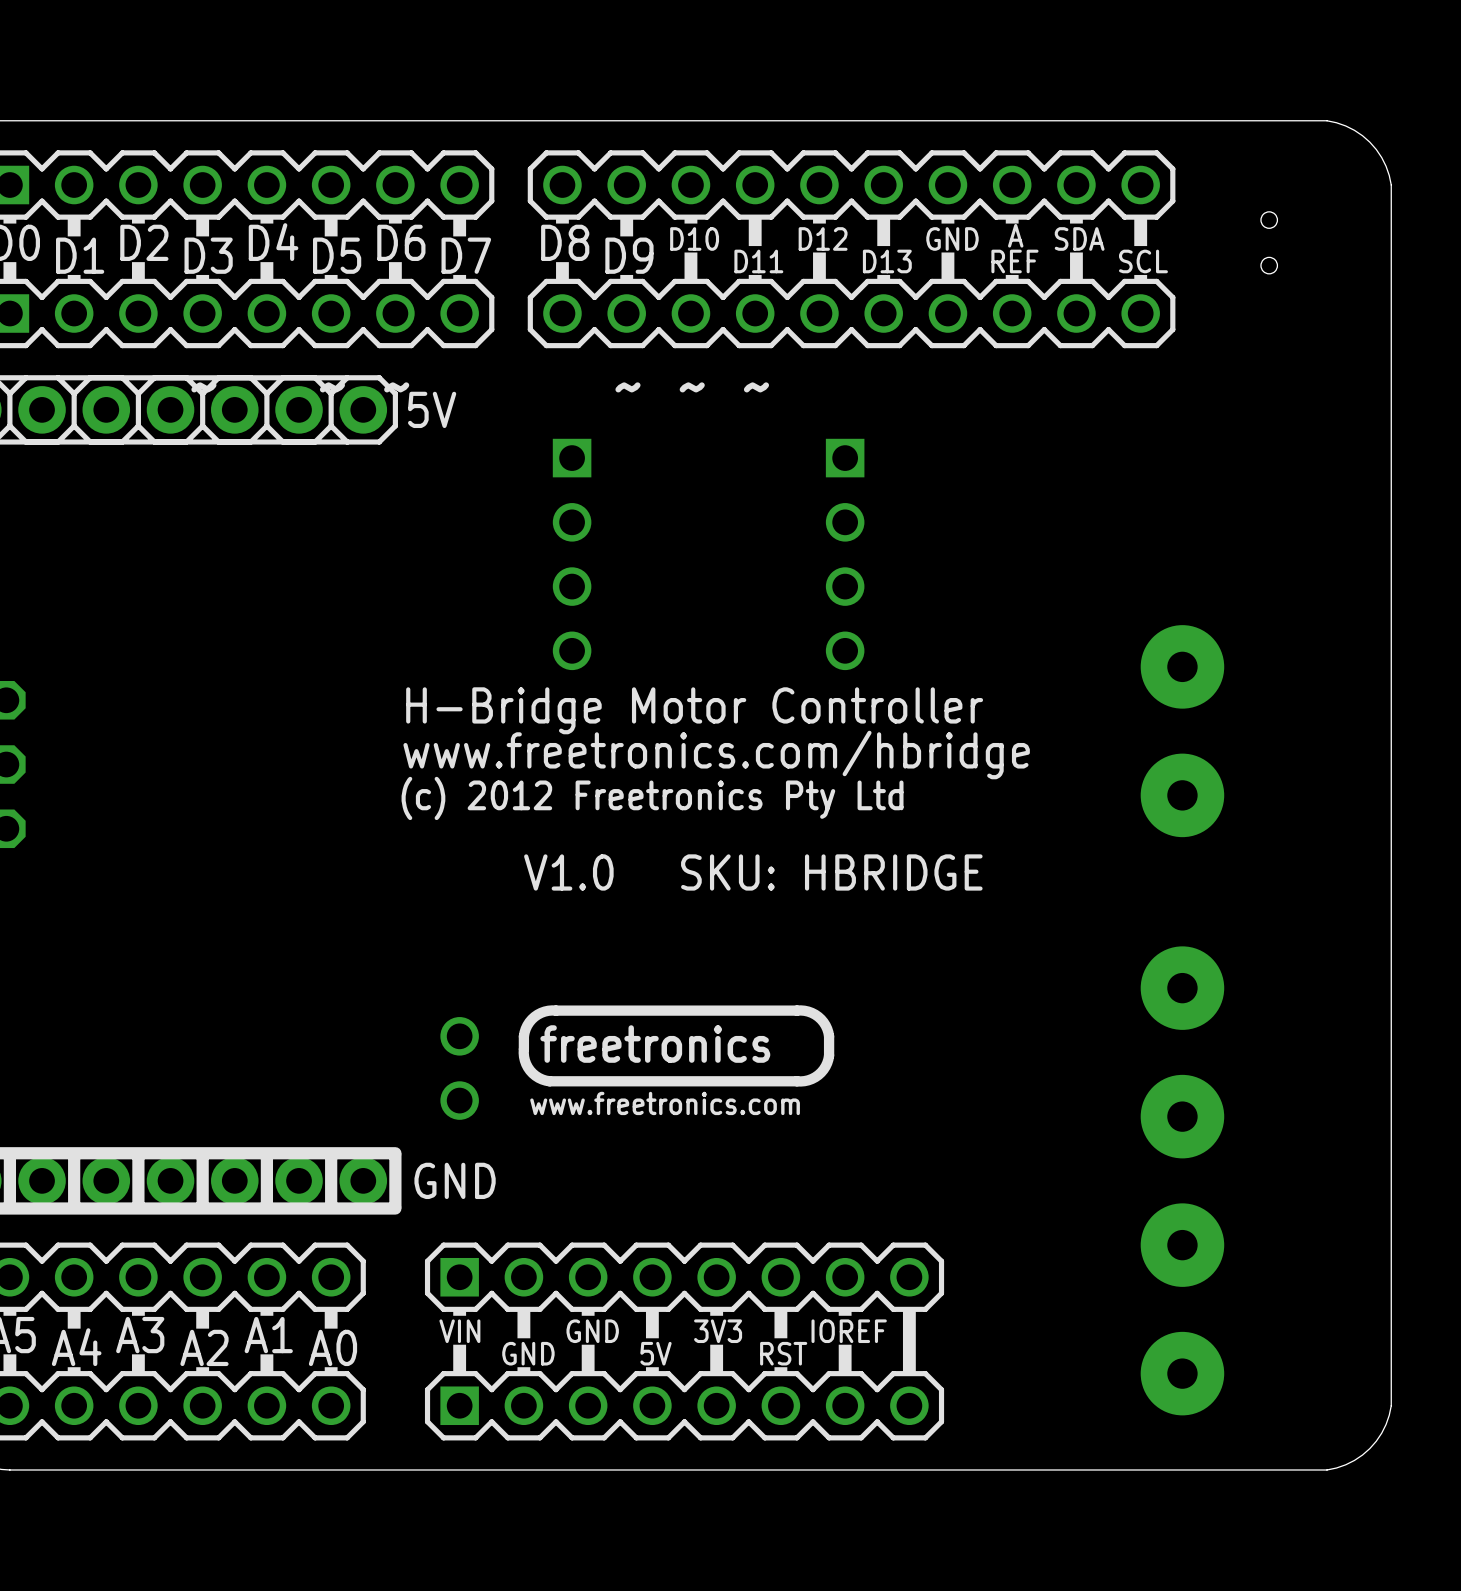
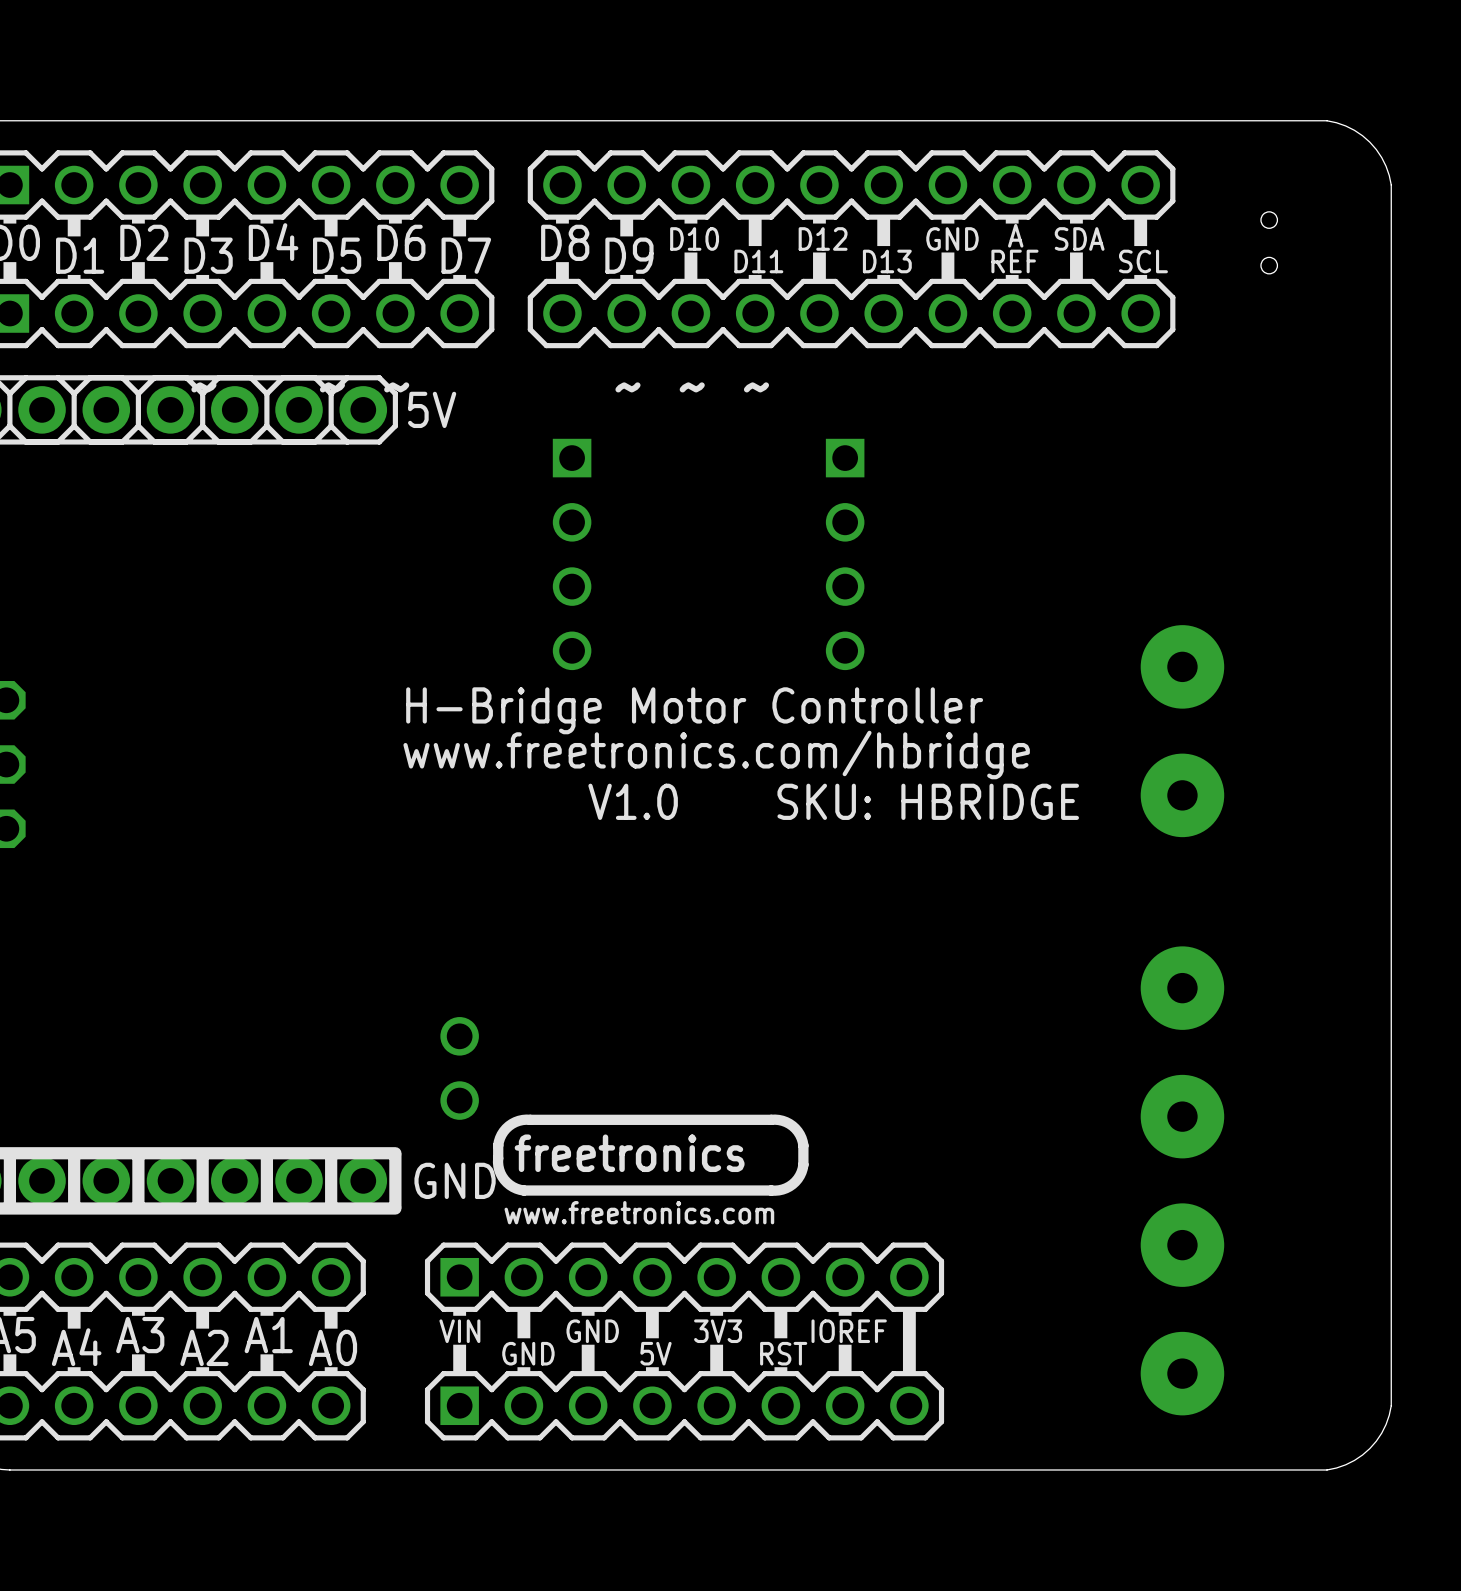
text: (c) 2012 Freetronics Pty Ltd (652, 798) -> none
text position: V1.0 (568, 872) -> V1.0 (633, 801)
text position: SKU: HBRIDGE (831, 872) -> SKU: HBRIDGE (928, 801)
line: (796, 1010) (548, 1010) (537, 1014) (527, 1025) (523, 1036) (524, 1056) (532, 1073) (549, 1081) (804, 1081) (818, 1075) (825, 1066) (829, 1055) (829, 1036) (825, 1025) (818, 1016) (808, 1011) (796, 1010) -> (771, 1119) (522, 1119) (512, 1123) (501, 1134) (498, 1145) (498, 1165) (506, 1182) (523, 1190) (778, 1190) (792, 1184) (799, 1175) (803, 1164) (803, 1145) (799, 1134) (792, 1126) (782, 1120) (771, 1119)
text position: freetronics (655, 1044) -> freetronics (629, 1153)
text position: www.freetronics.com (665, 1103) -> www.freetronics.com (639, 1212)

